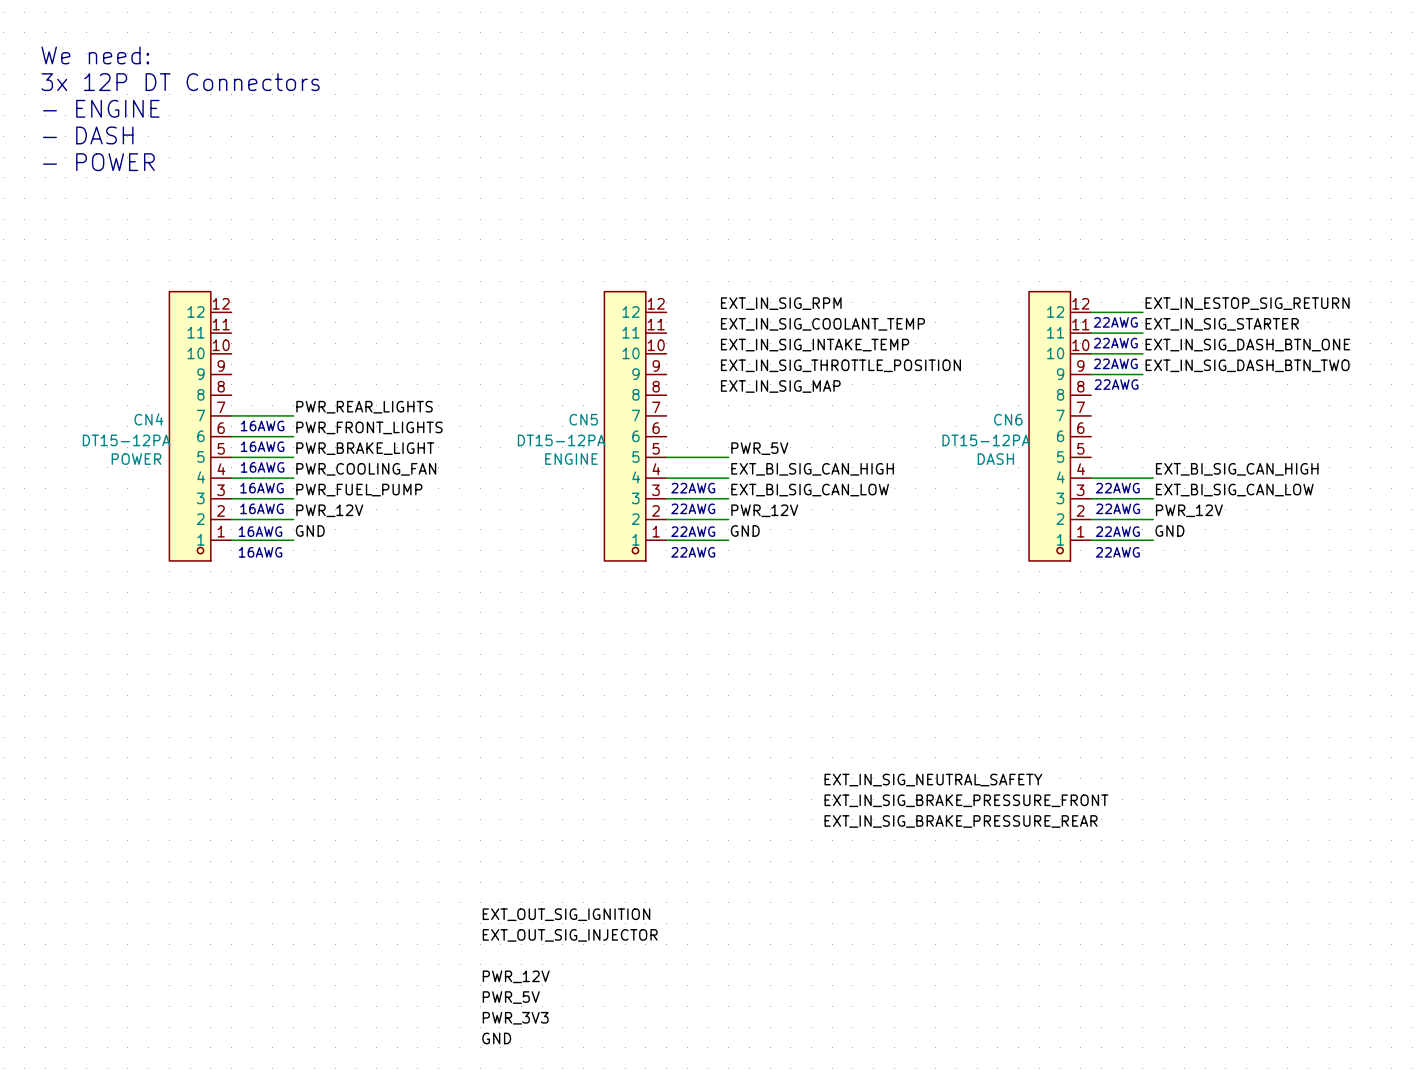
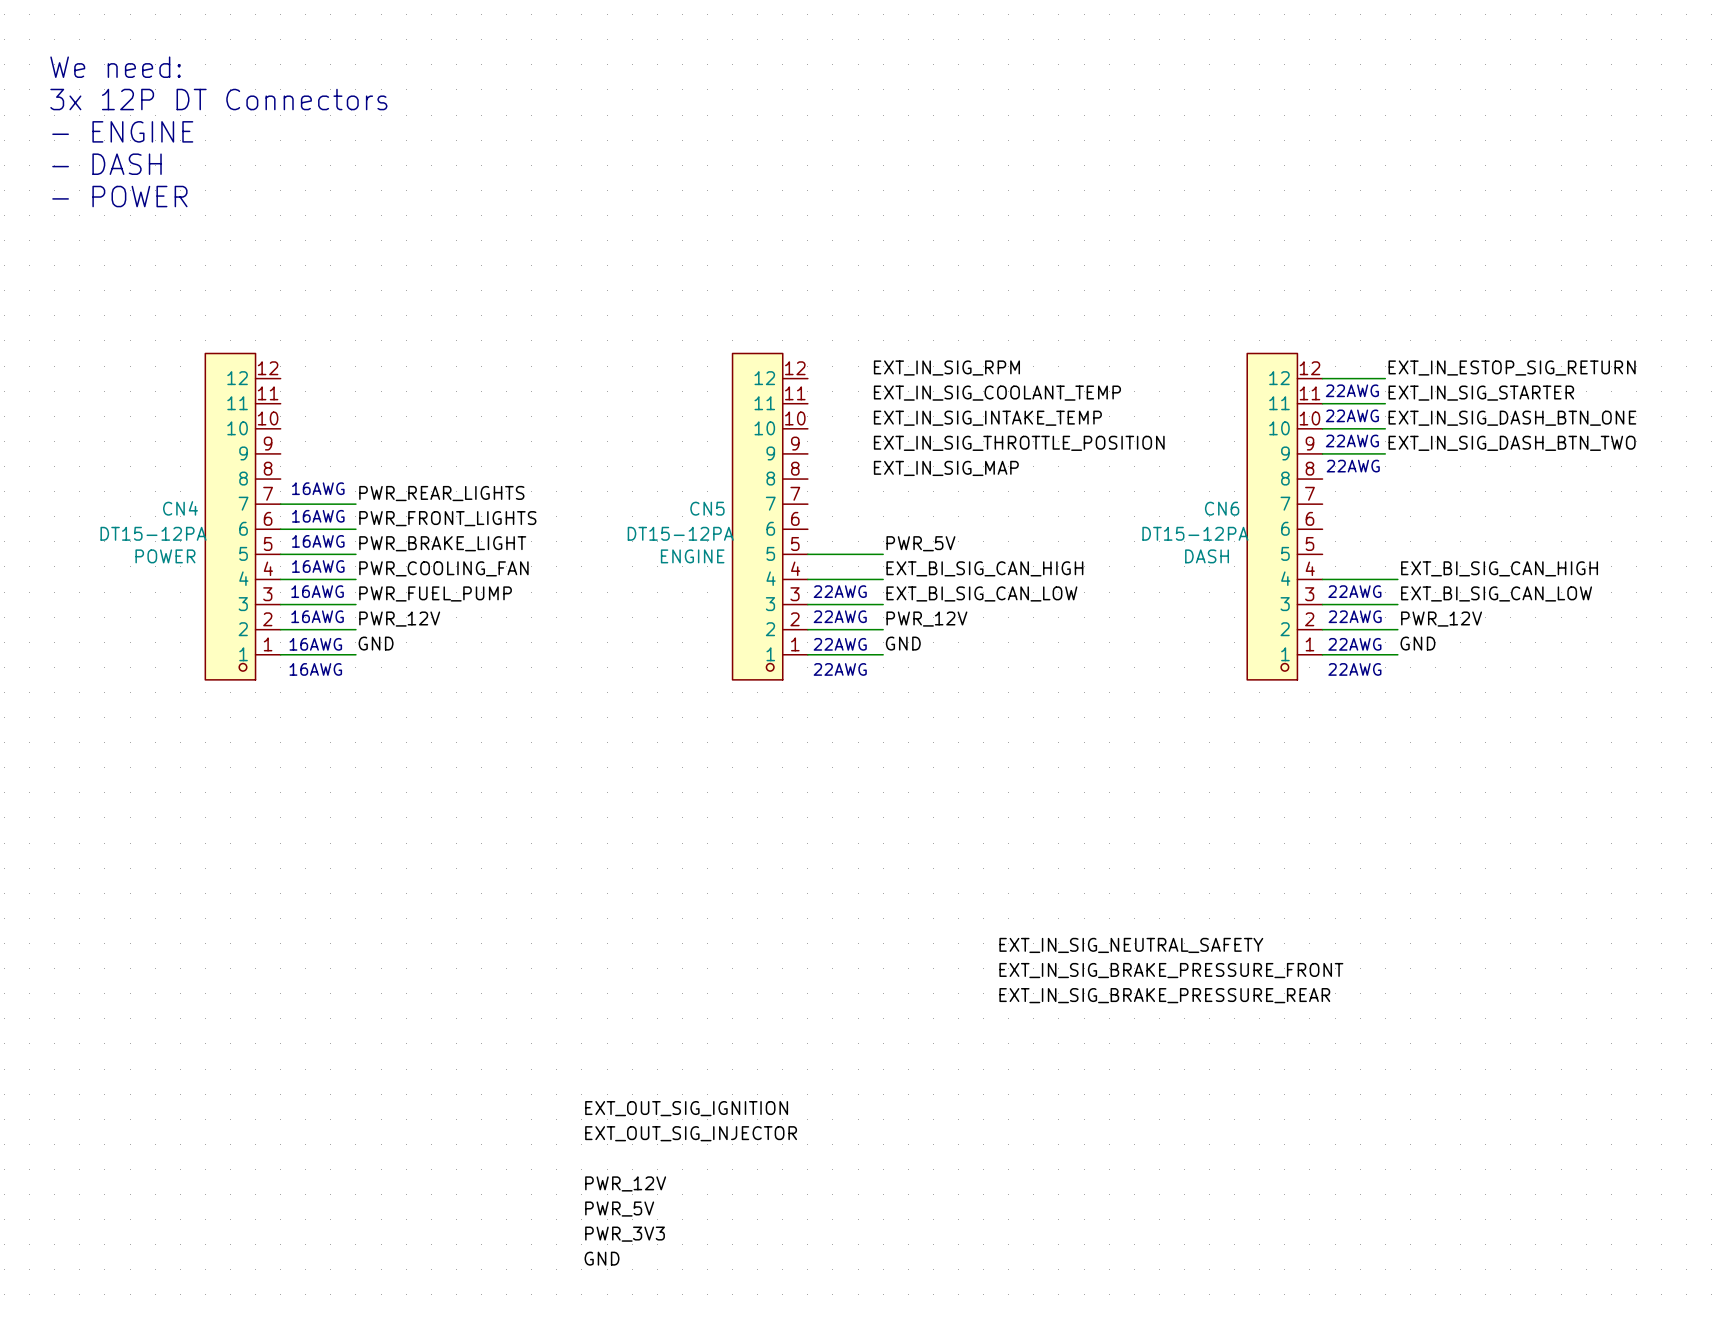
text: none -> 16AWG (318, 488)

